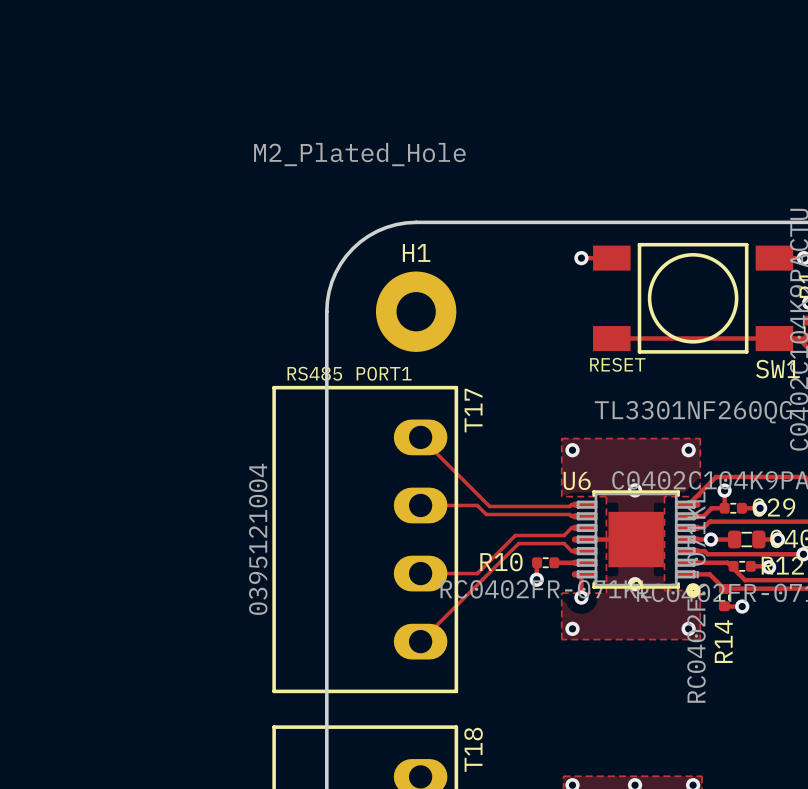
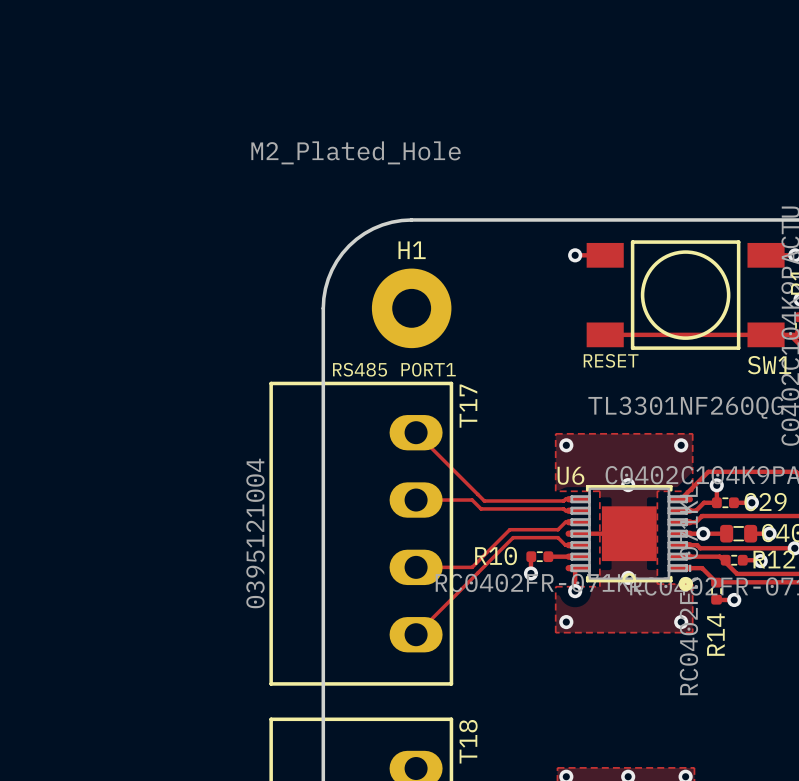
text position: RS485 PORT1 (349, 373) -> RS485 PORT1 (394, 369)

